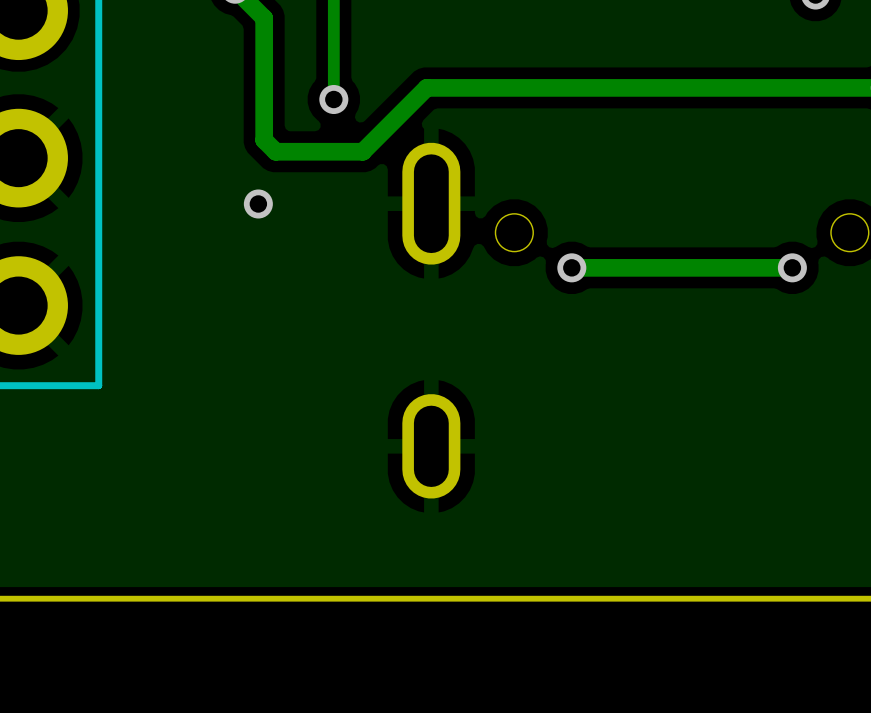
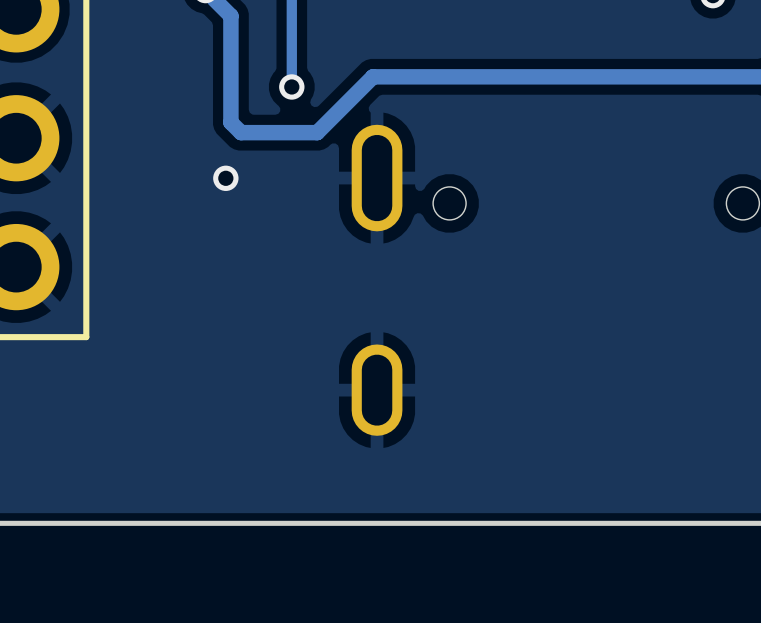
via: (571, 267) -> none
track: (792, 267) (571, 267) -> none
via: (792, 267) -> none

